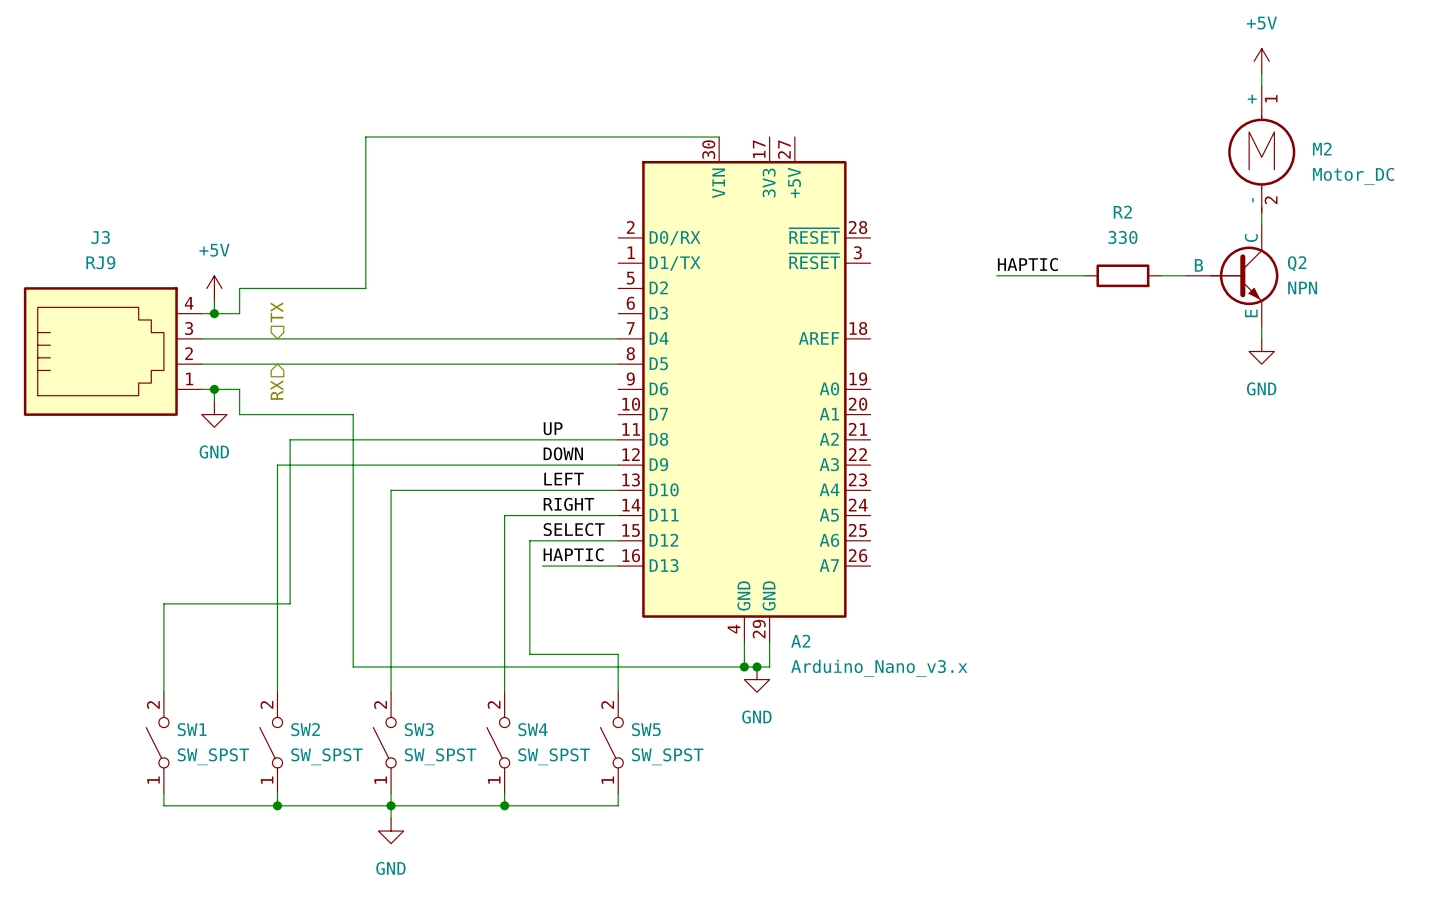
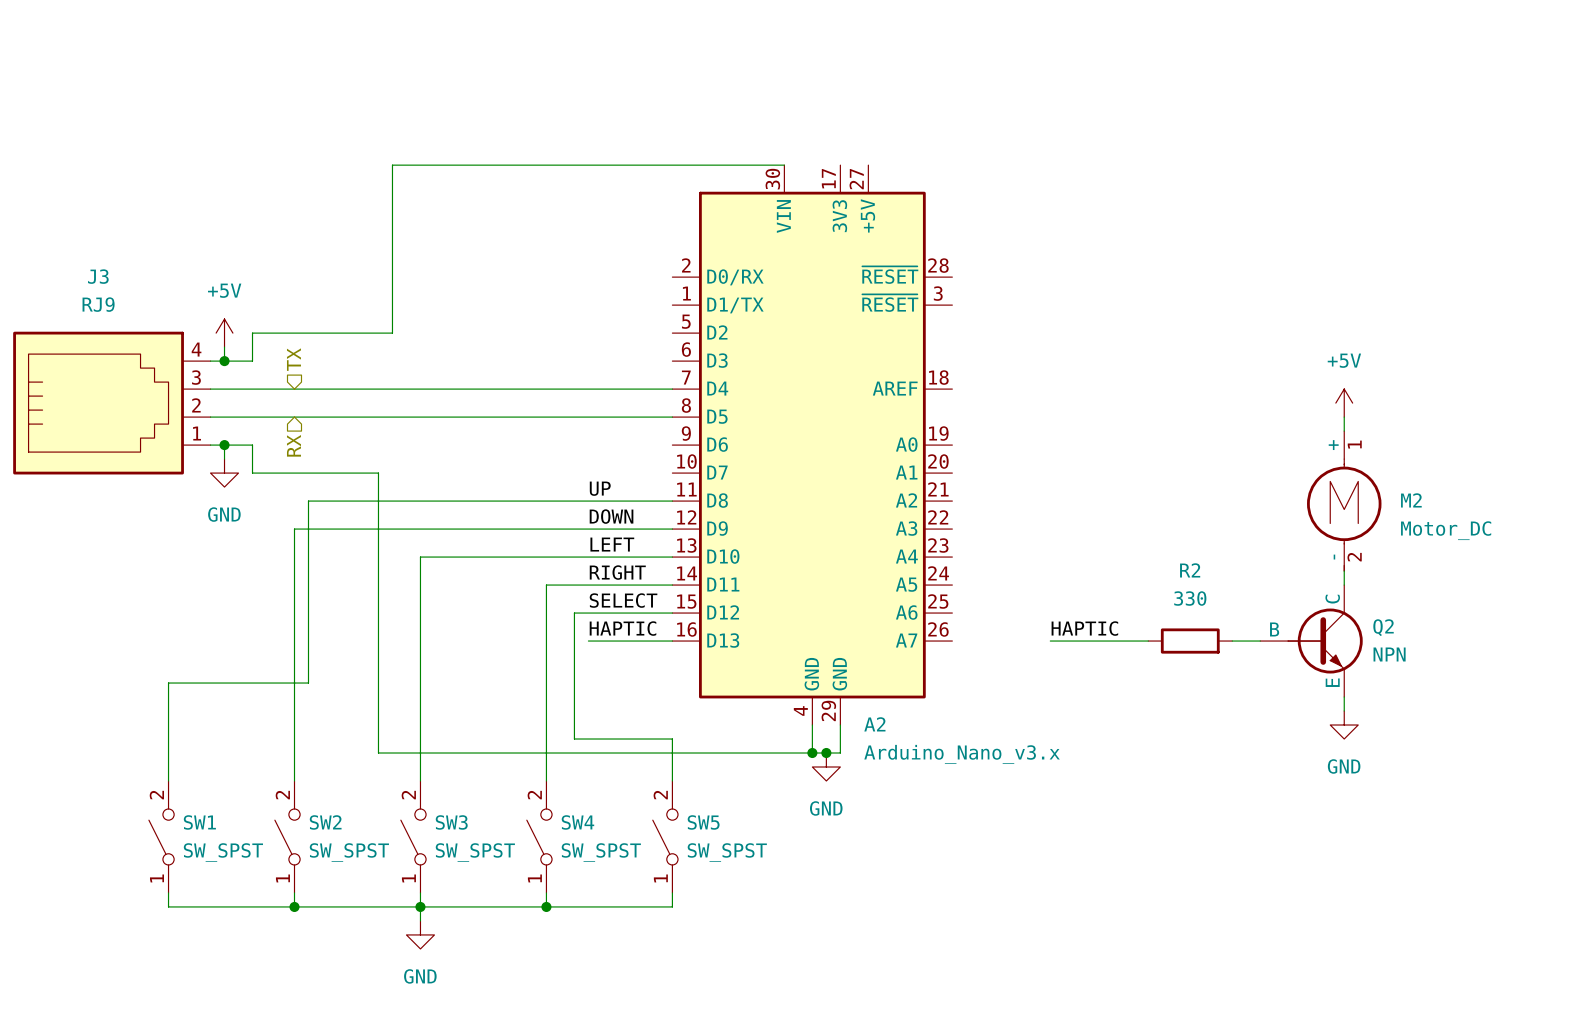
power symbol: +5V (1261, 61) -> none
wire: (1261, 73) (1261, 86) -> none
M2 position: (1261, 149) -> (1344, 501)
wire: (1261, 212) (1261, 225) -> none
label: HAPTIC (1027, 264) -> none
wire: (996, 275) (1085, 275) -> none
R2 position: (1122, 275) -> (1190, 641)
wire: (1160, 275) (1186, 275) -> none
Q2 position: (1232, 275) -> (1311, 641)
wire: (1261, 326) (1261, 338) -> (1344, 417) (1344, 431)
power symbol: none -> +5V (1344, 403)
power symbol: GND (1261, 351) -> none
wire: none -> (1344, 571) (1344, 585)
label: none -> HAPTIC (1084, 628)
wire: none -> (1050, 641) (1148, 641)
wire: none -> (1232, 641) (1260, 641)
wire: none -> (1344, 697) (1344, 711)
power symbol: none -> GND (1344, 725)

